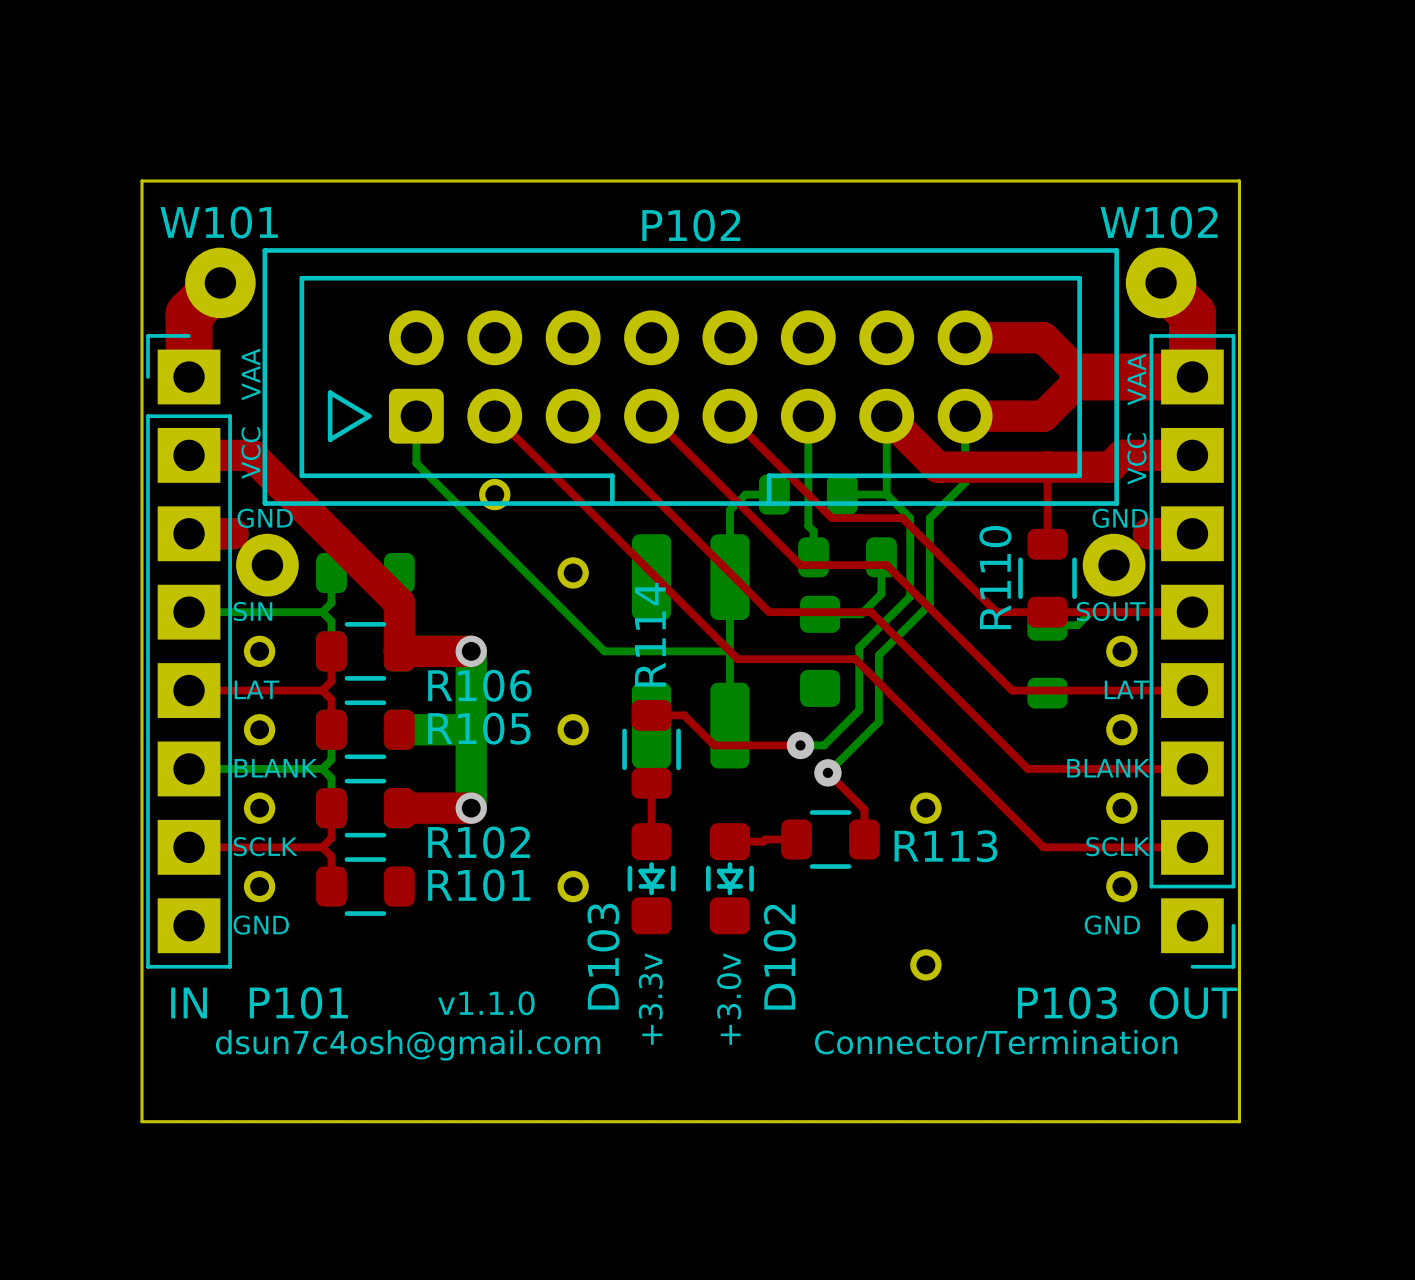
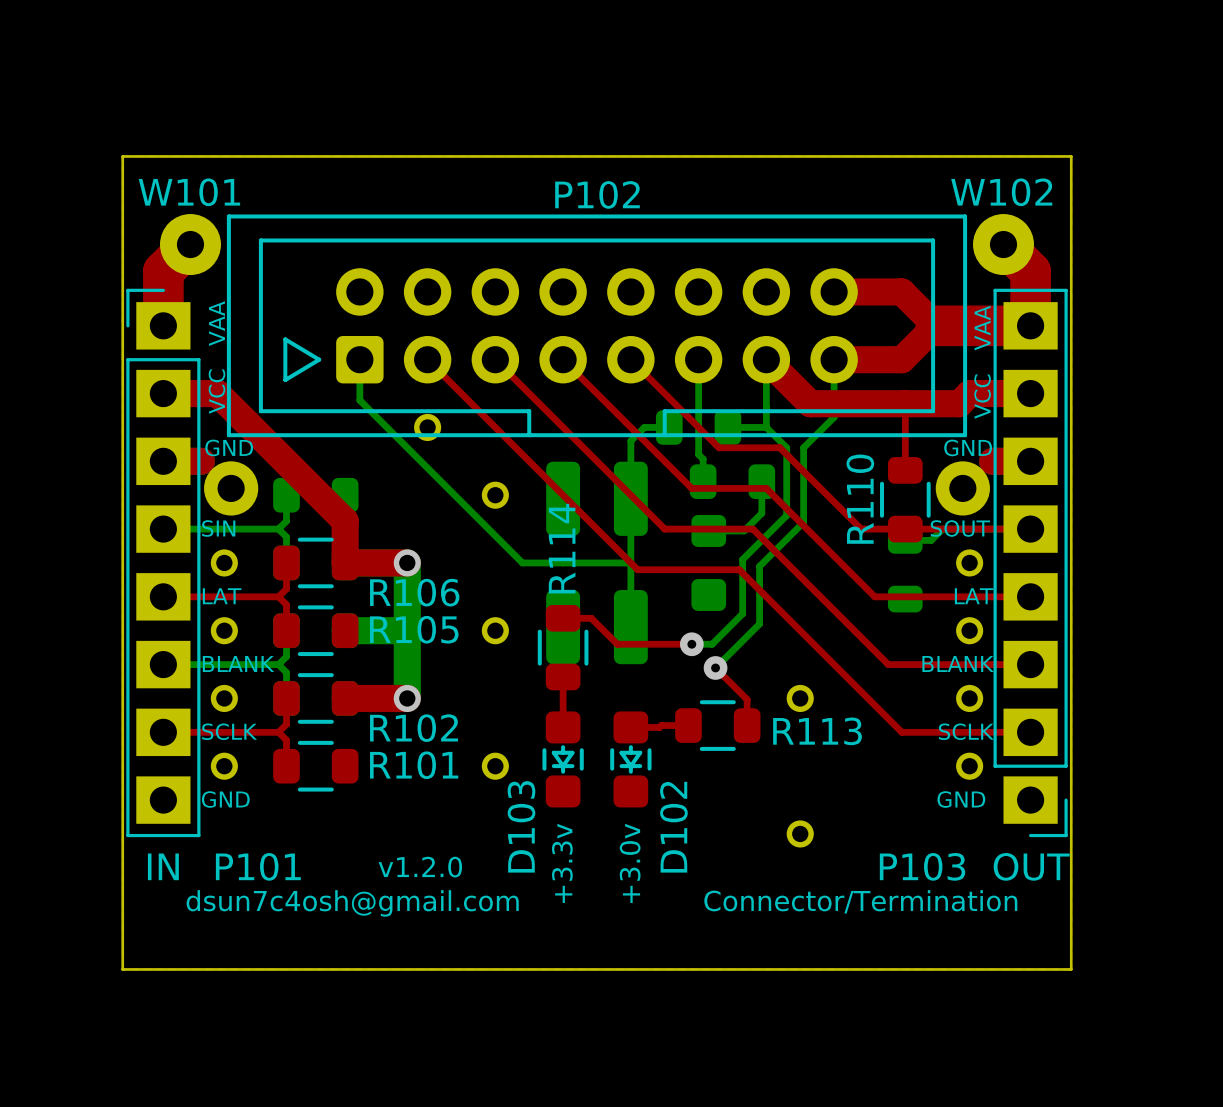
text: v1.1.0 (486, 1003) -> v1.2.0 (420, 867)

